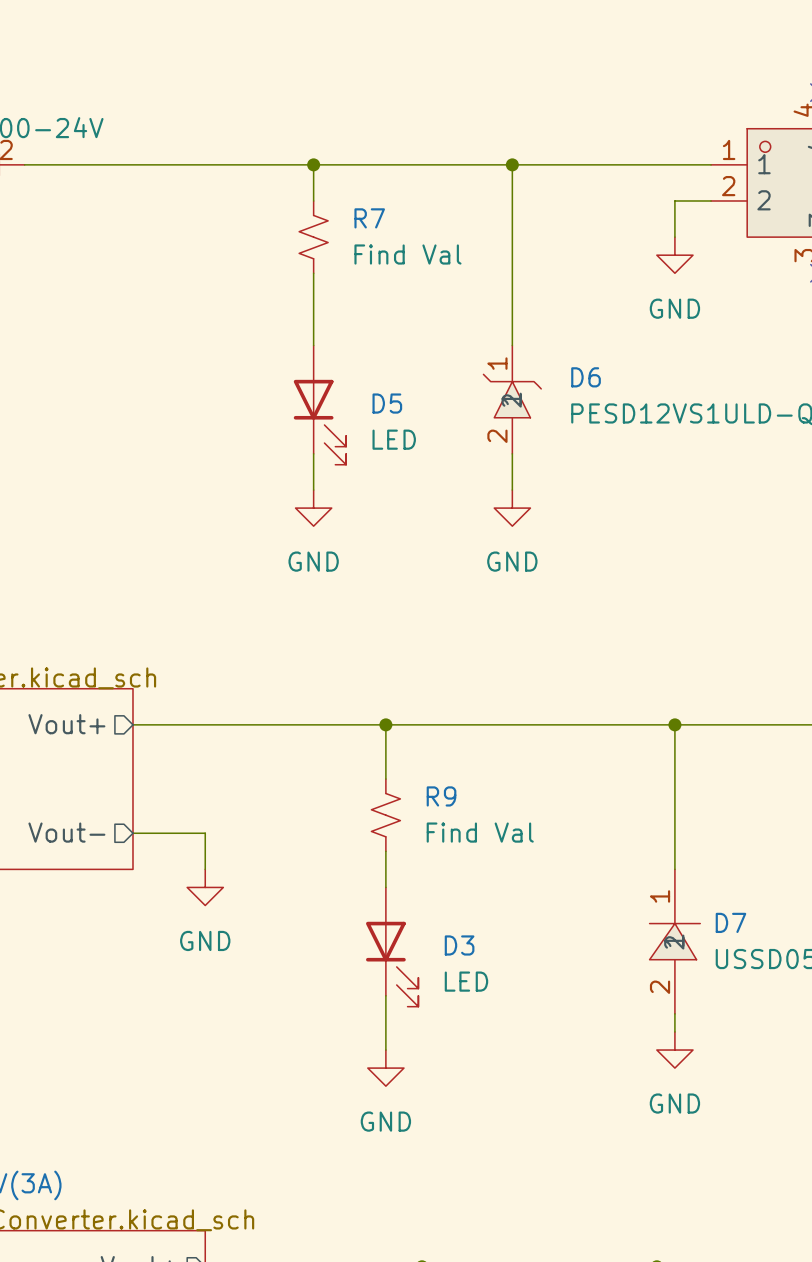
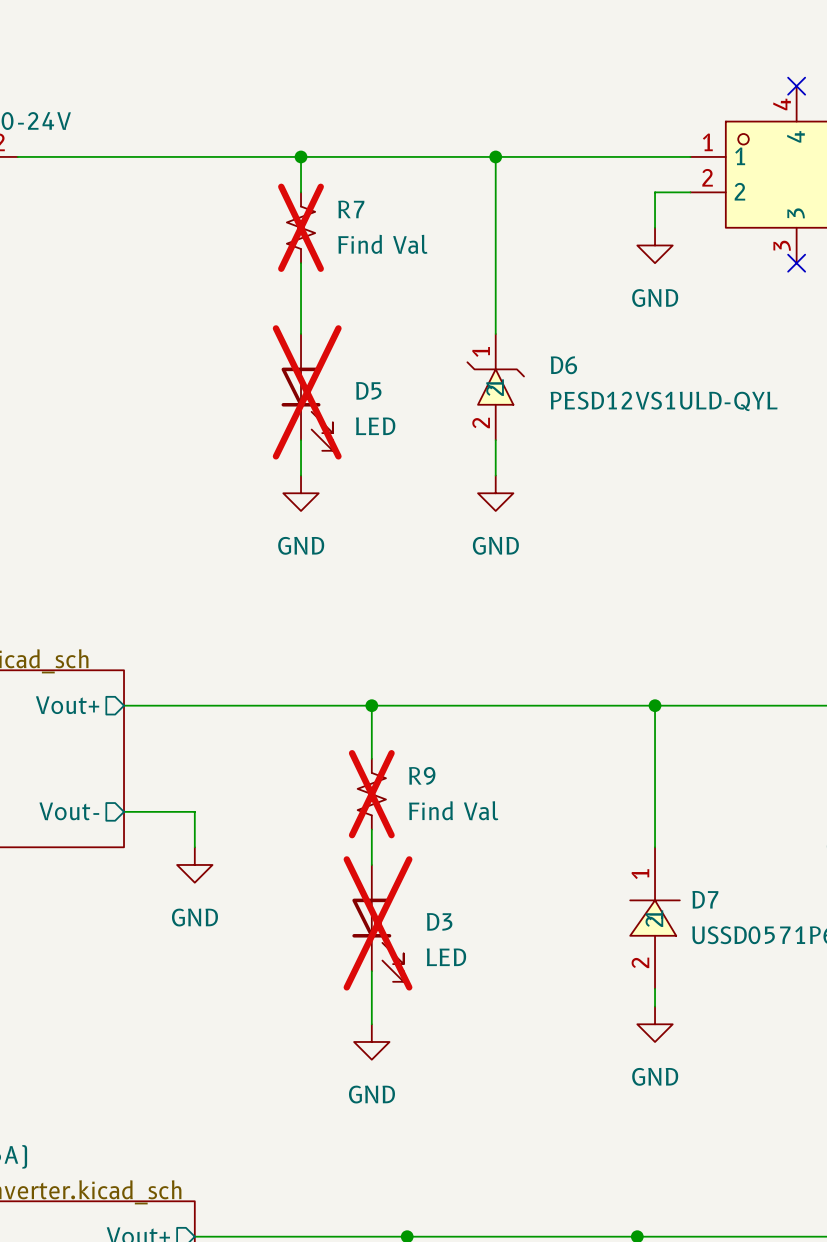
R7 do-not-place cross: none -> (301, 227)
D5 do-not-place cross: none -> (307, 392)
R9 do-not-place cross: none -> (371, 794)
D3 do-not-place cross: none -> (378, 923)

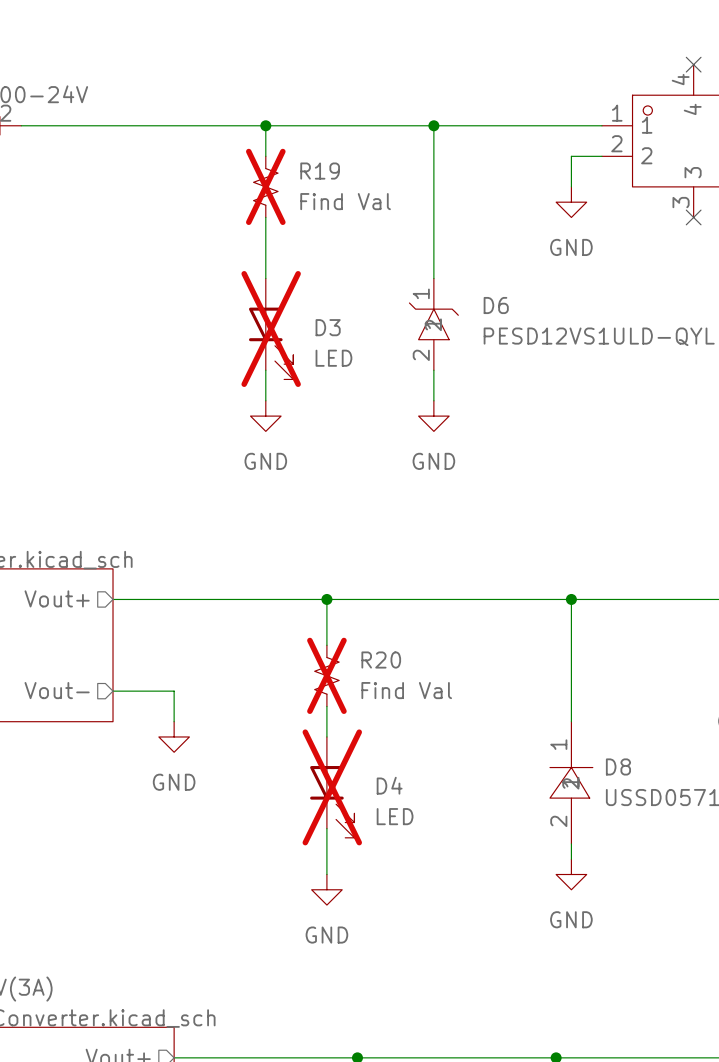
R7 name: R7 (351, 209) -> R19 (320, 171)
D5 name: D5 (368, 390) -> D3 (328, 327)
R9 name: R9 (422, 775) -> R20 (381, 660)
D7 name: D7 (705, 899) -> D8 (618, 766)
D3 name: D3 (439, 921) -> D4 (389, 785)

